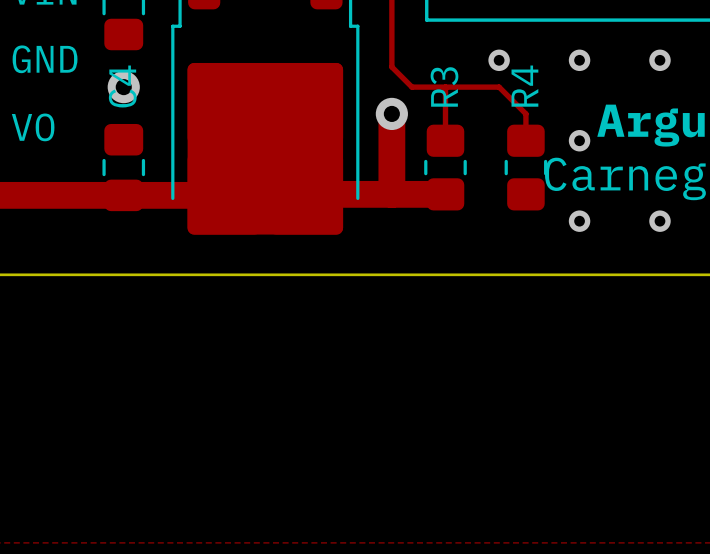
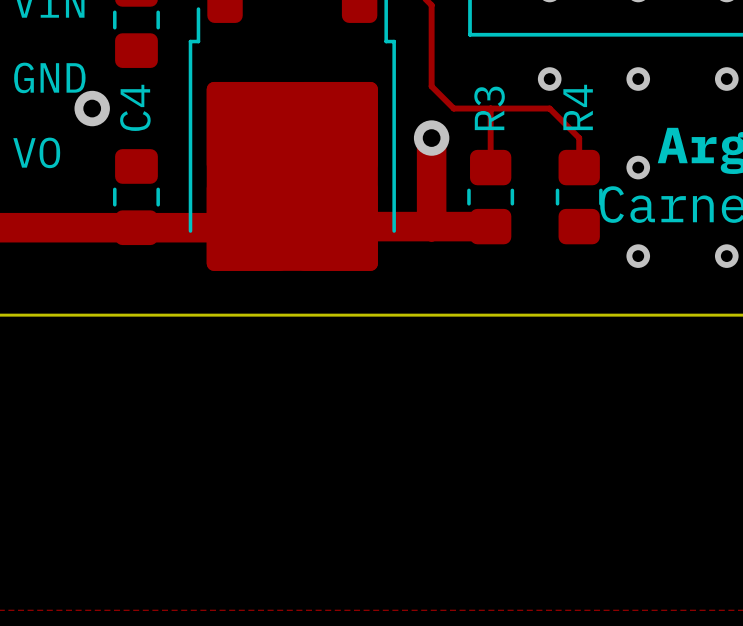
via position: (123, 87) -> (92, 108)

